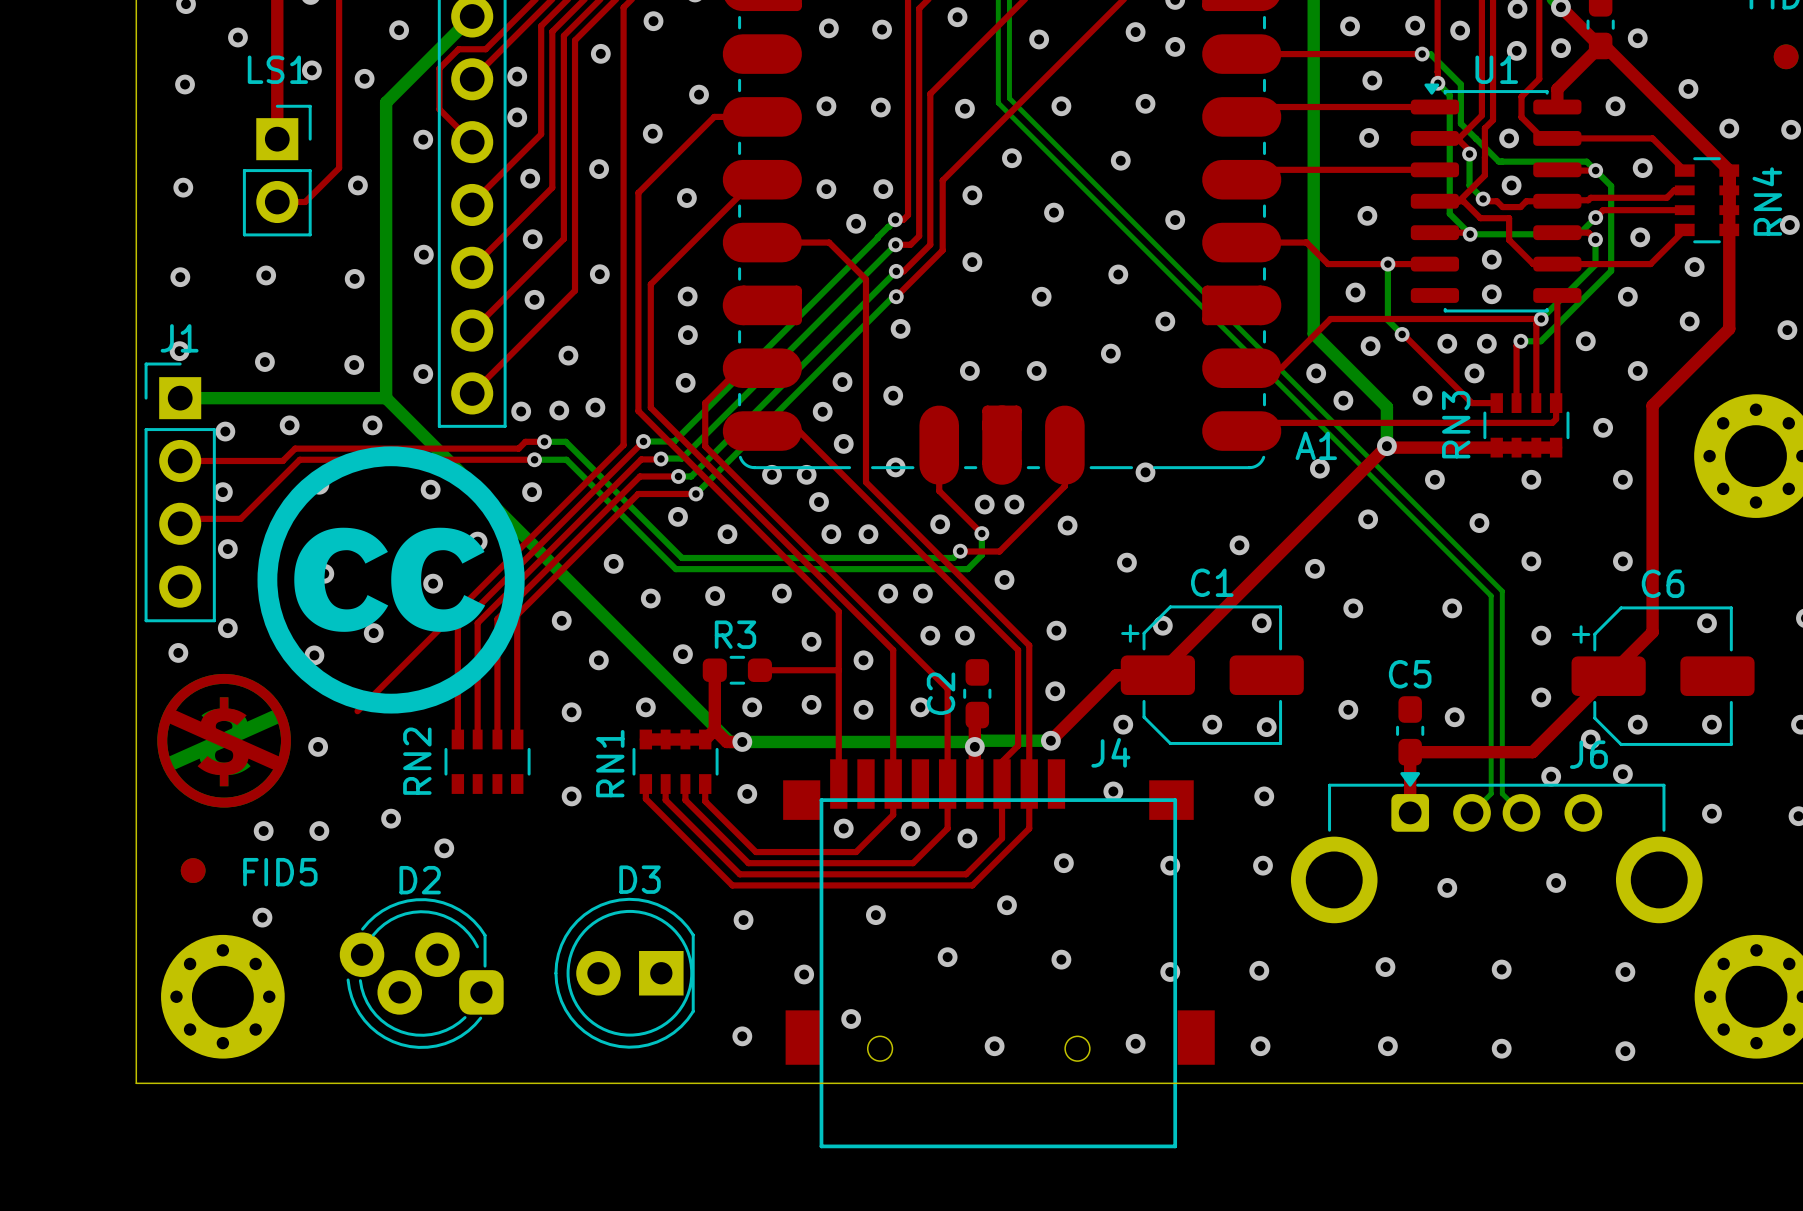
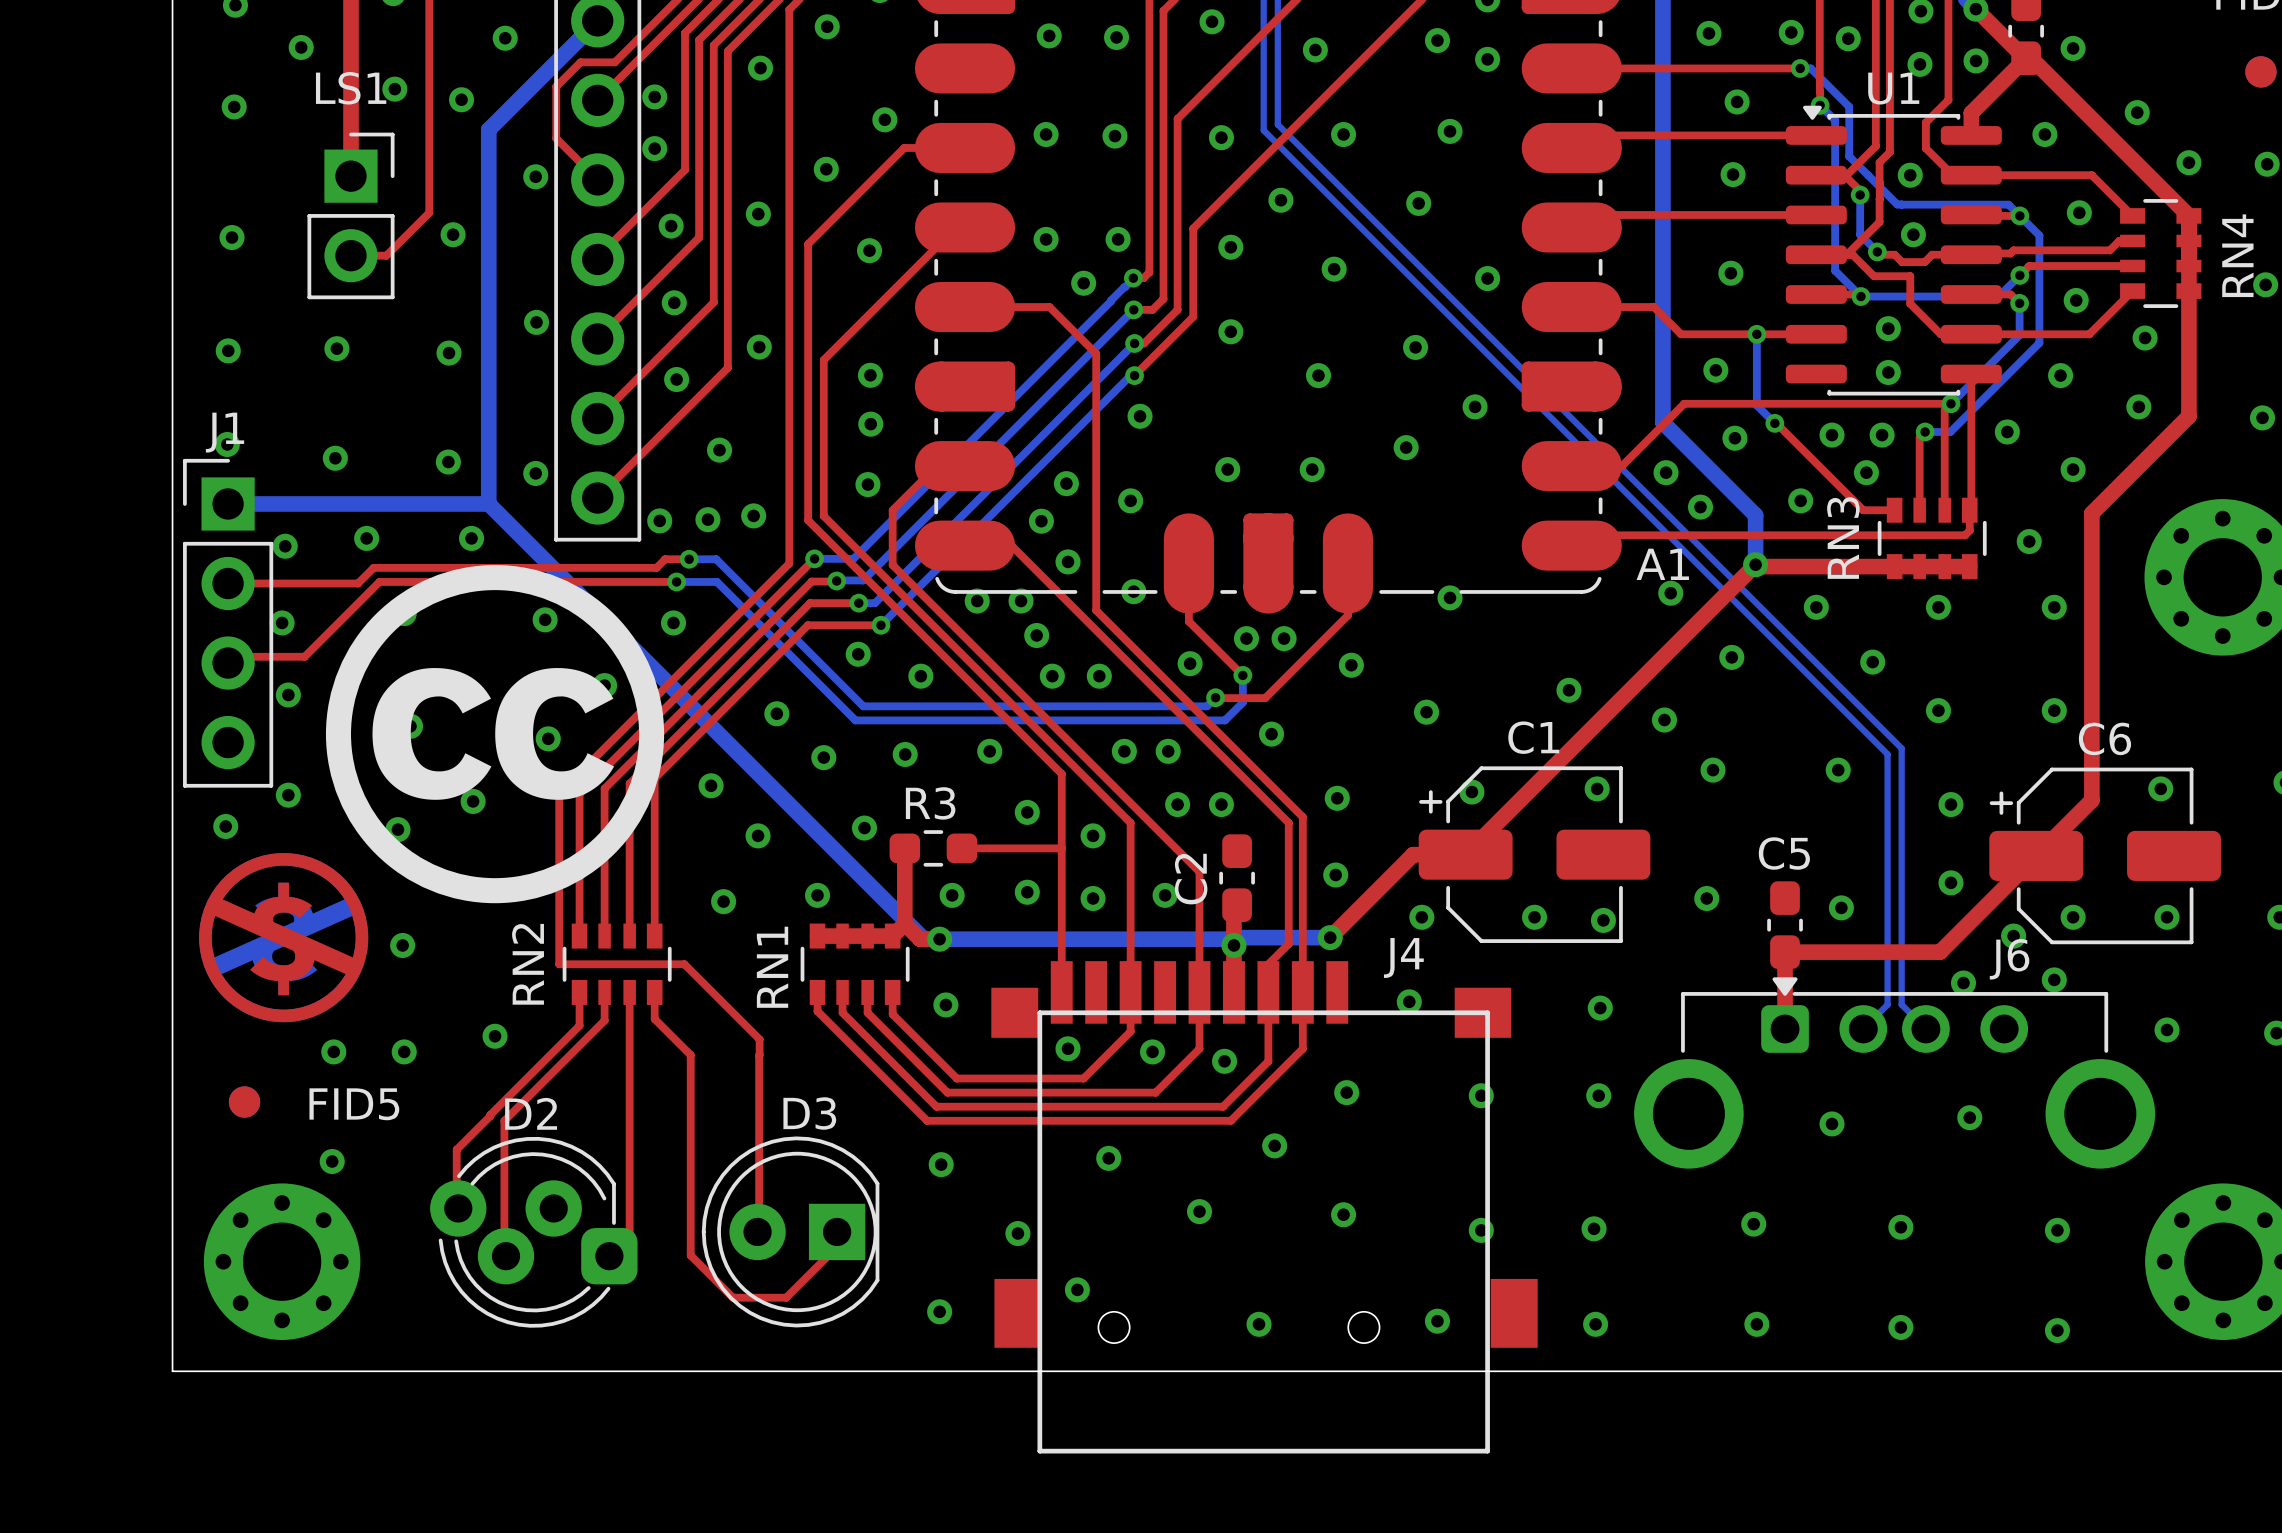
top track: (441, 626) (357, 711) -> (559, 793) (559, 964) (684, 964) (759, 1039) (759, 1231)
top track: none -> (579, 992) (579, 1025) (456, 1149) (456, 1208)
top track: none -> (604, 992) (604, 1020) (504, 1120) (504, 1256)
top track: none -> (629, 992) (629, 1234) (607, 1256)
top track: none -> (654, 992) (654, 1019) (690, 1055) (690, 1255) (732, 1297) (786, 1297) (838, 1245) (838, 1231)
via: (571, 796) -> none
via: (444, 848) -> none

